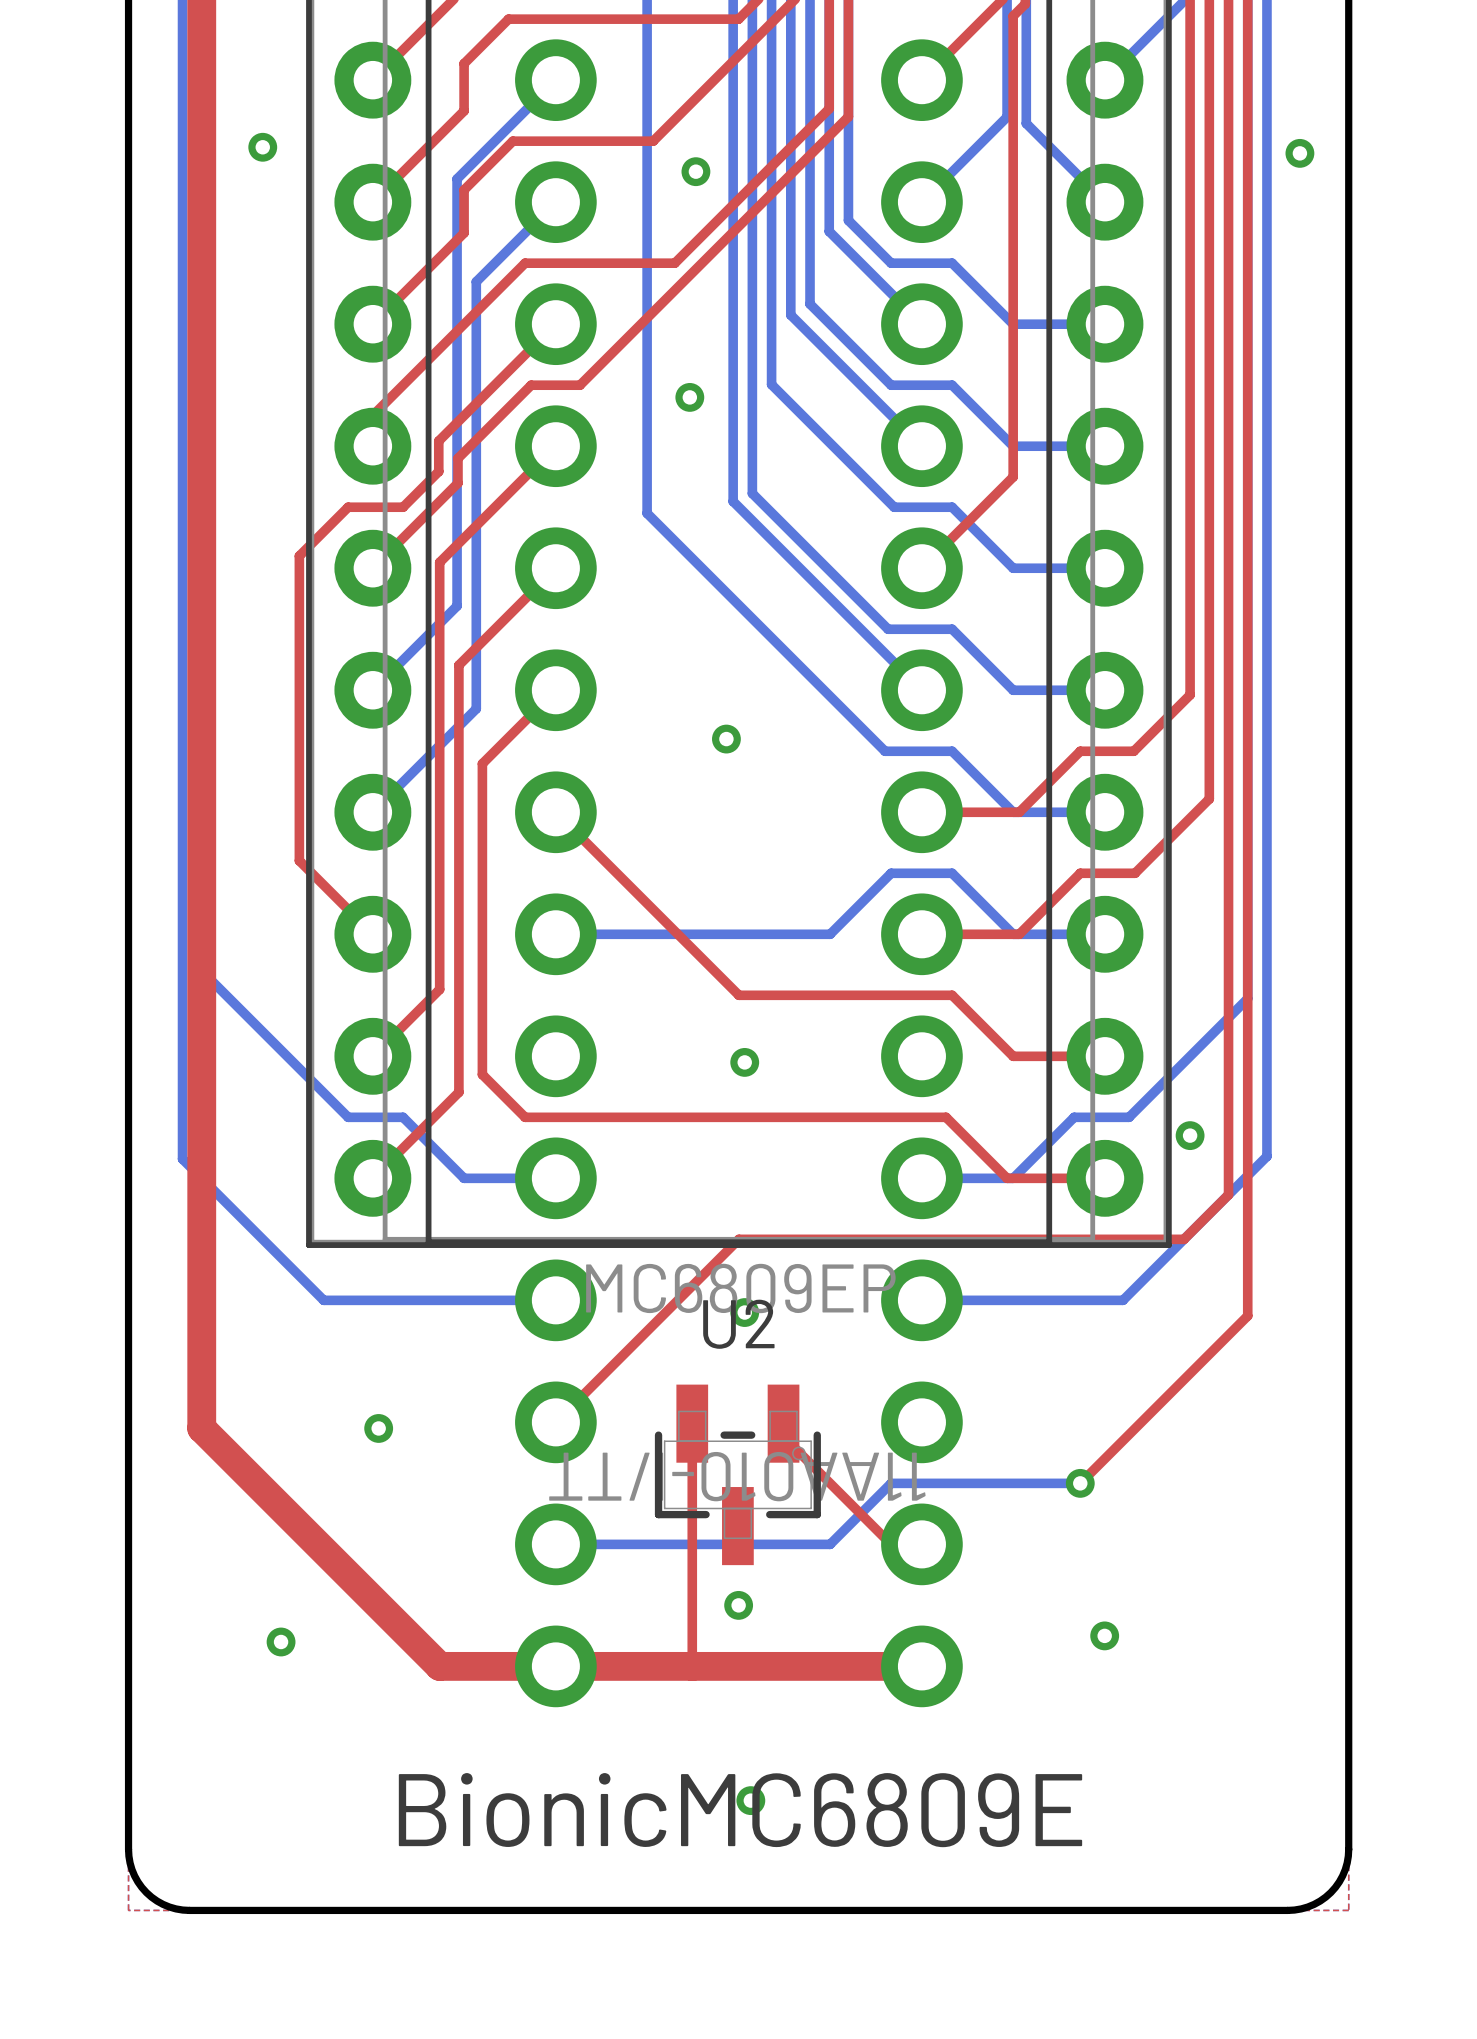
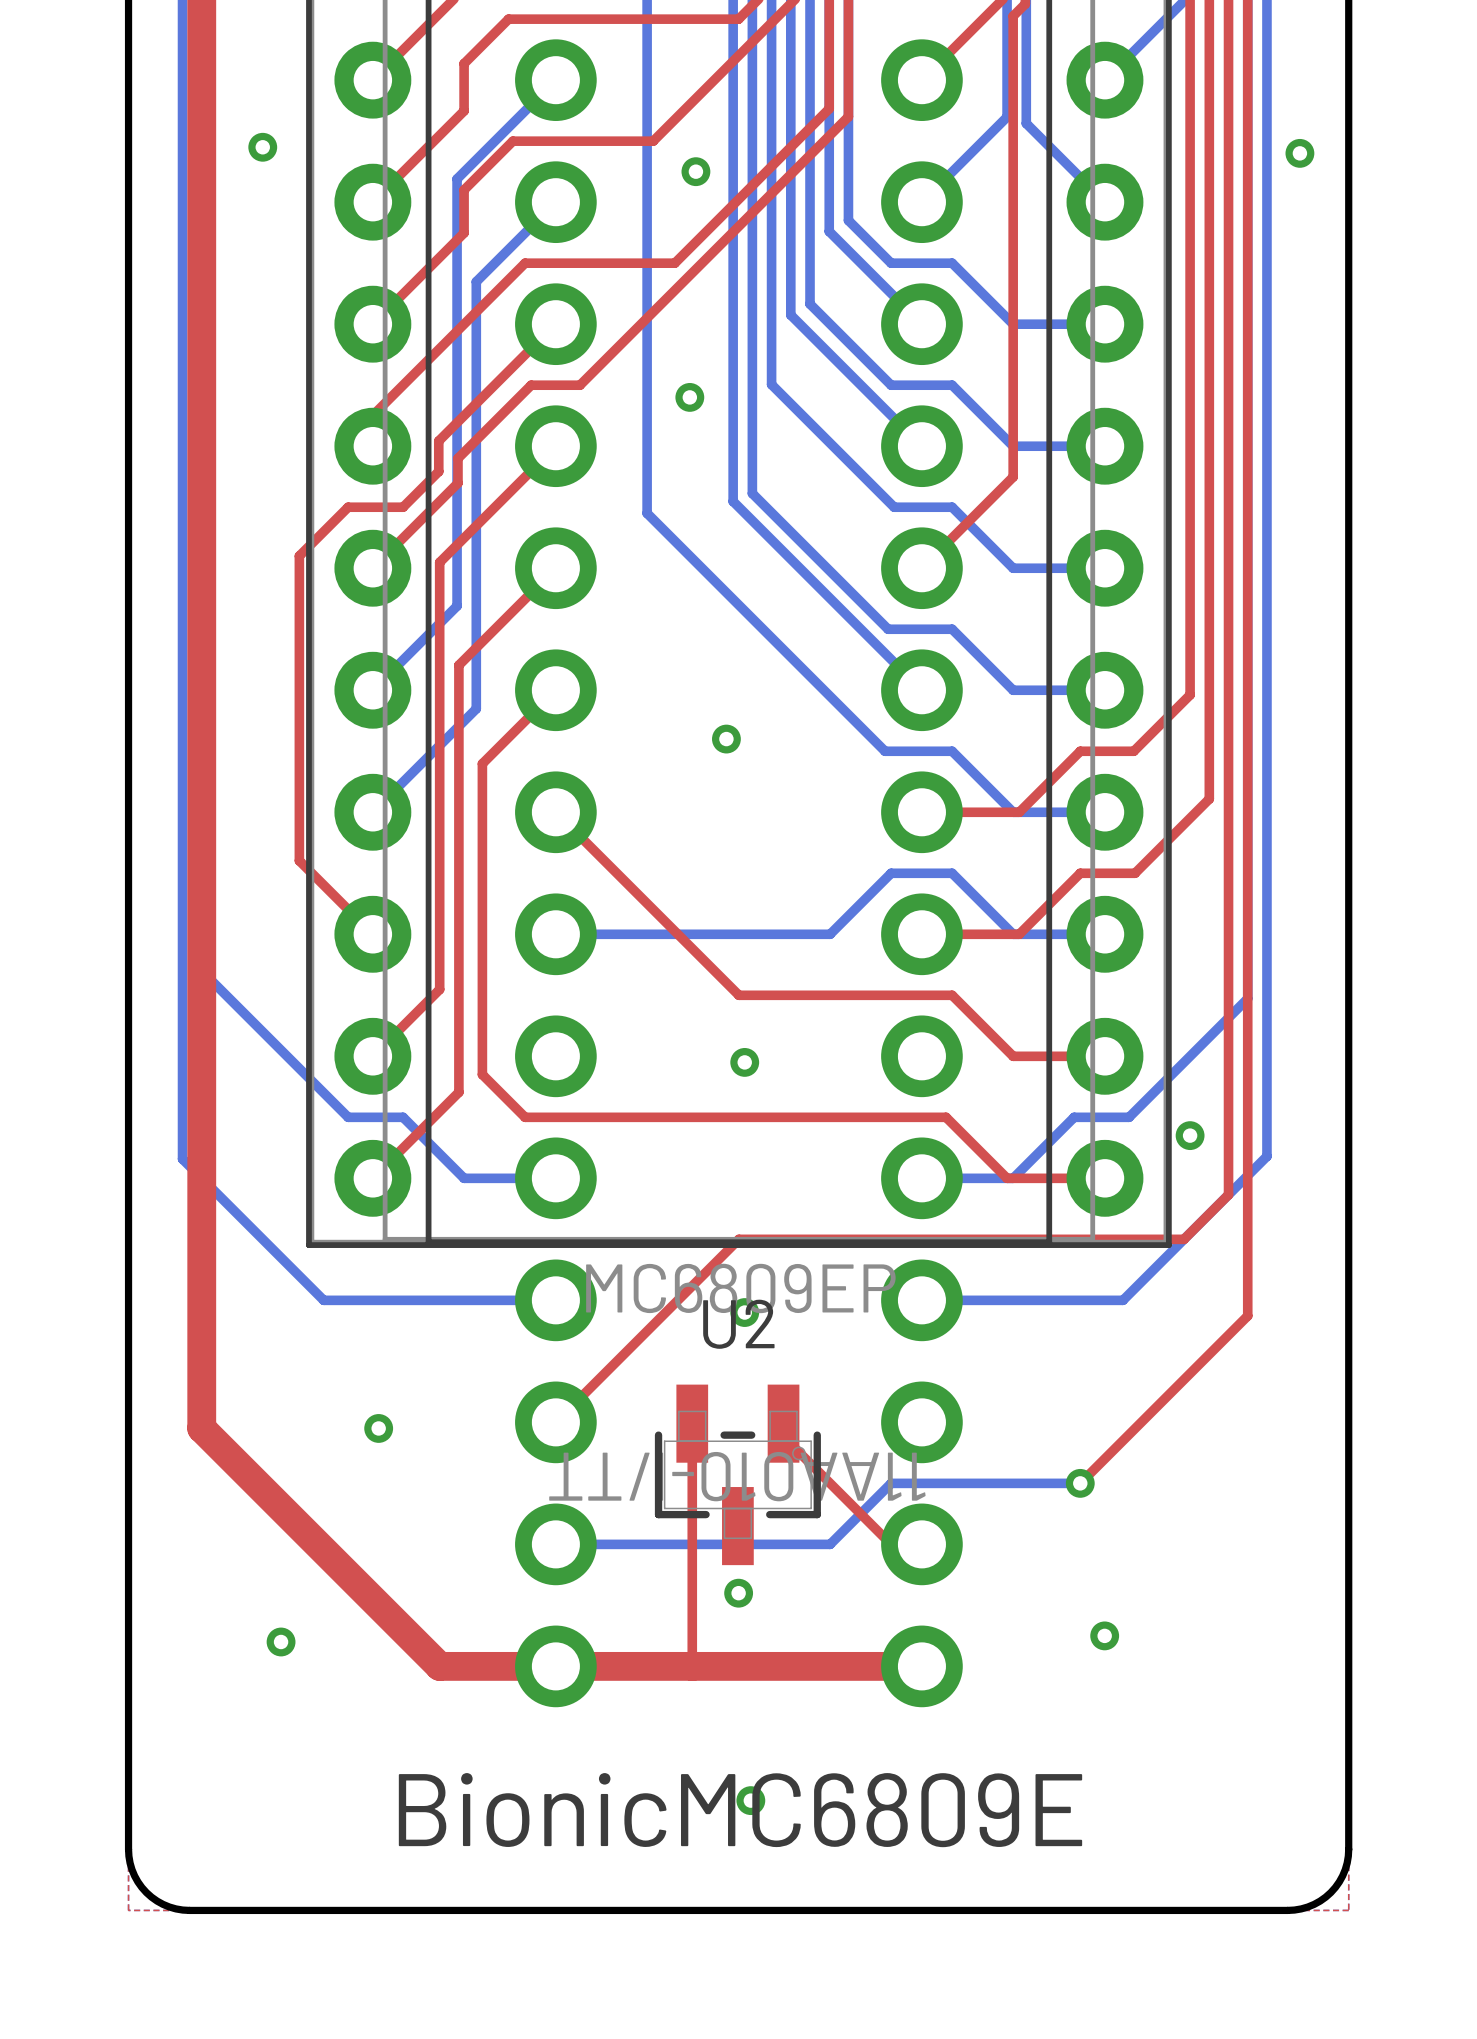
via position: (738, 1605) -> (738, 1593)

